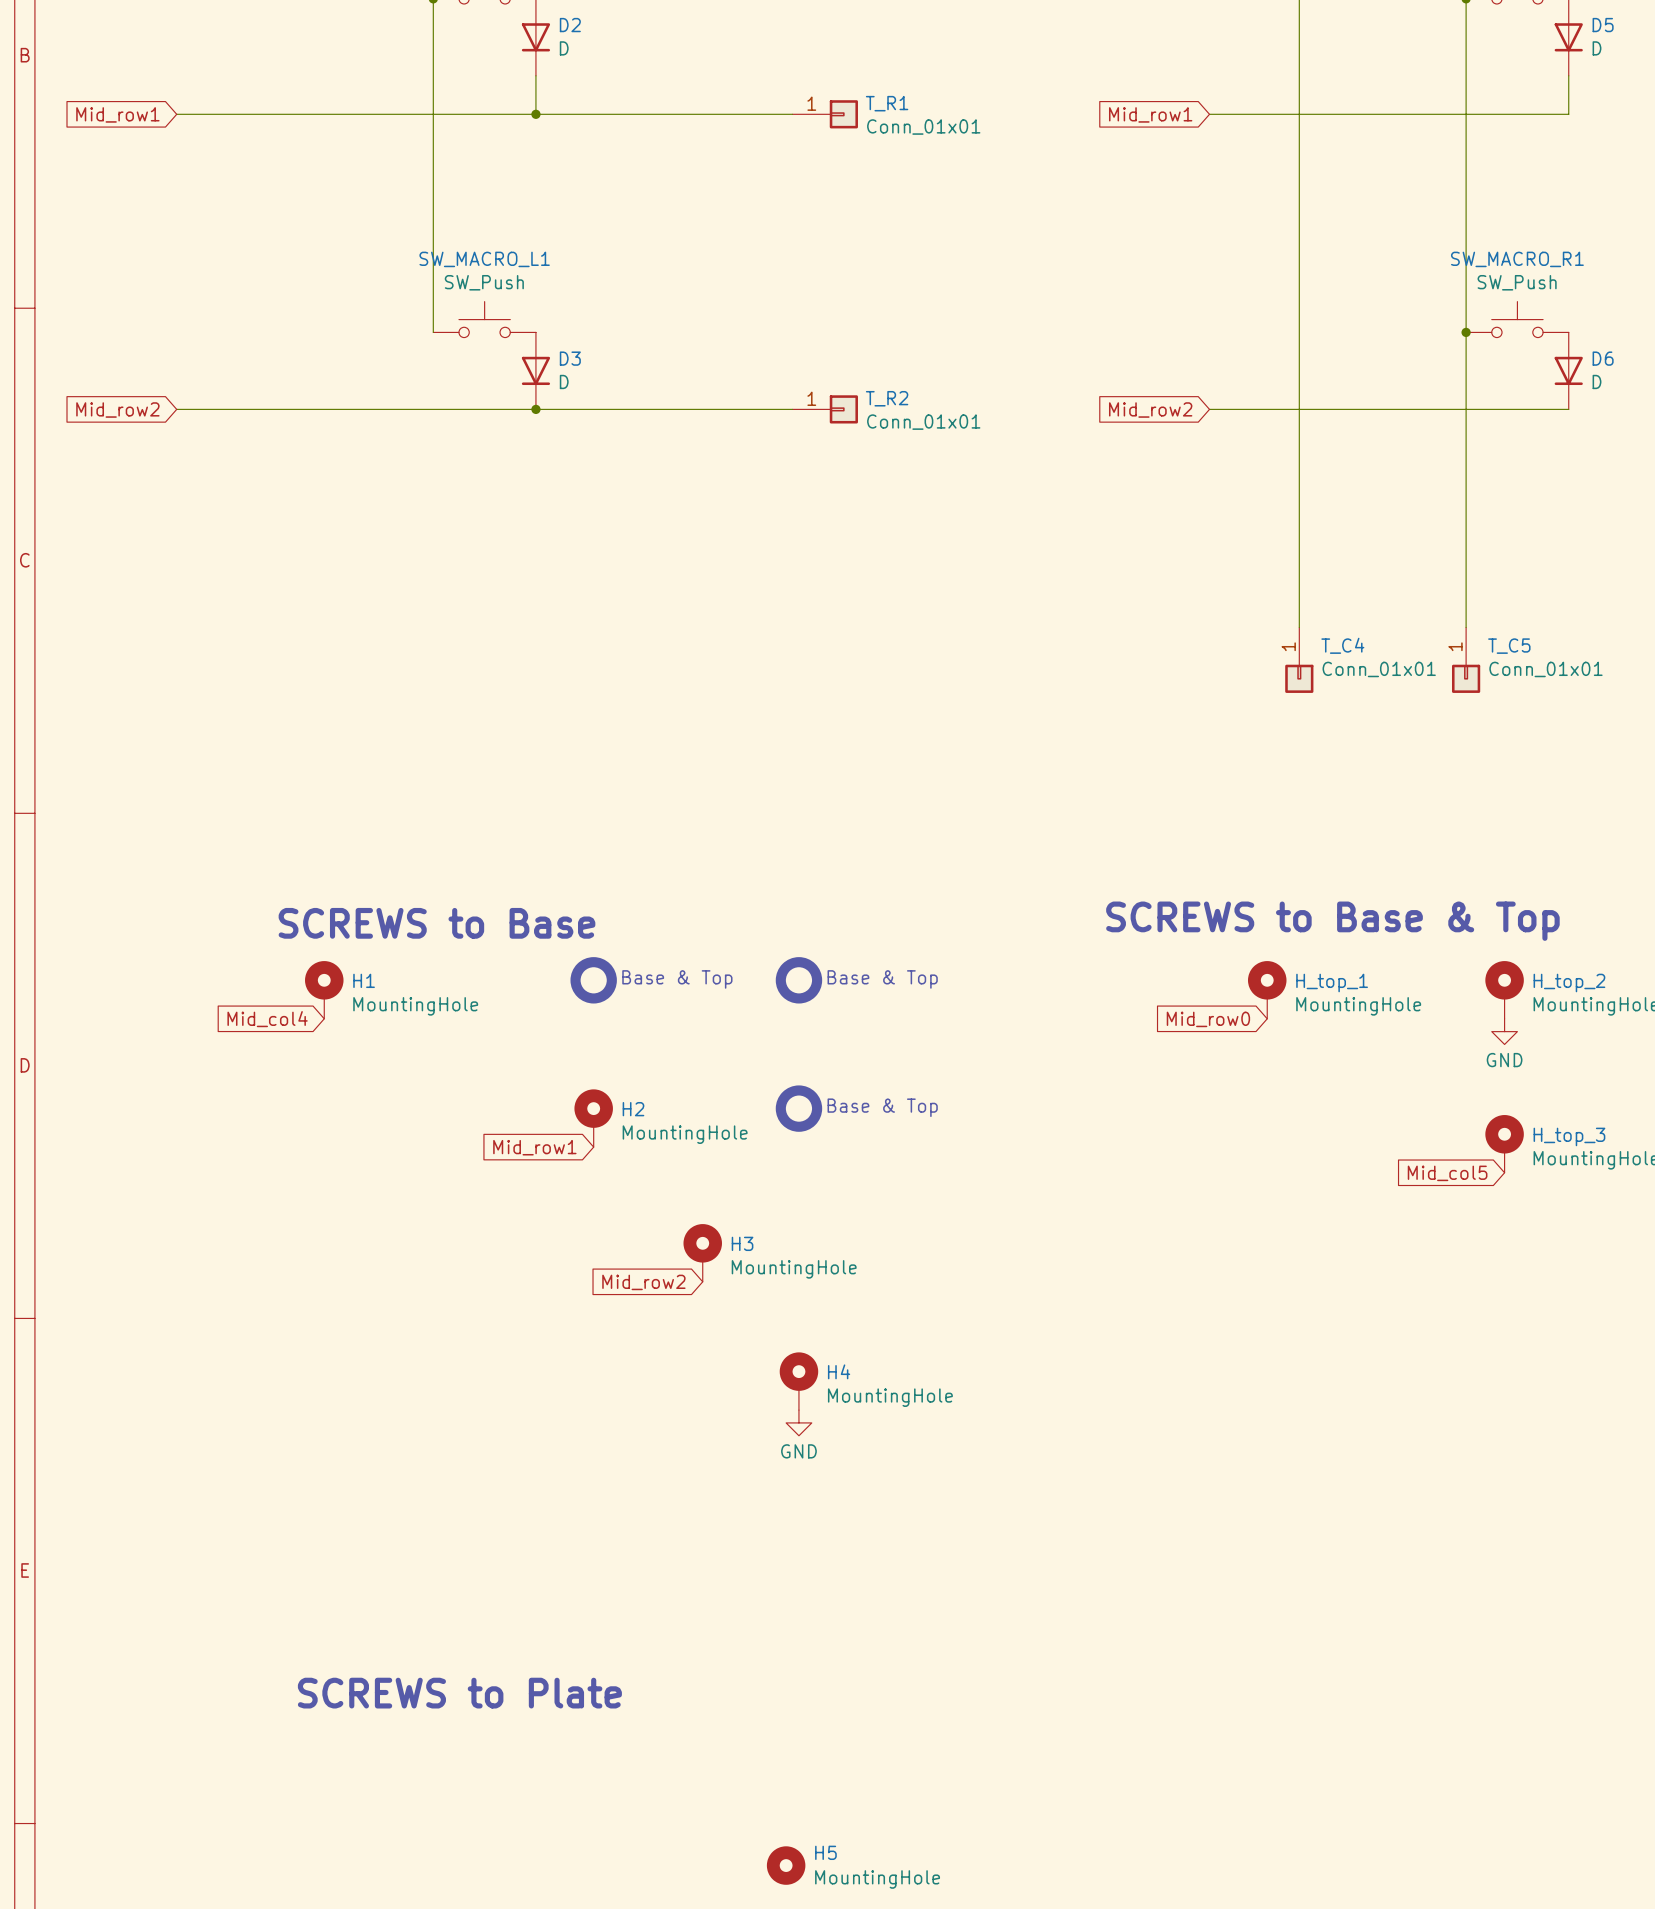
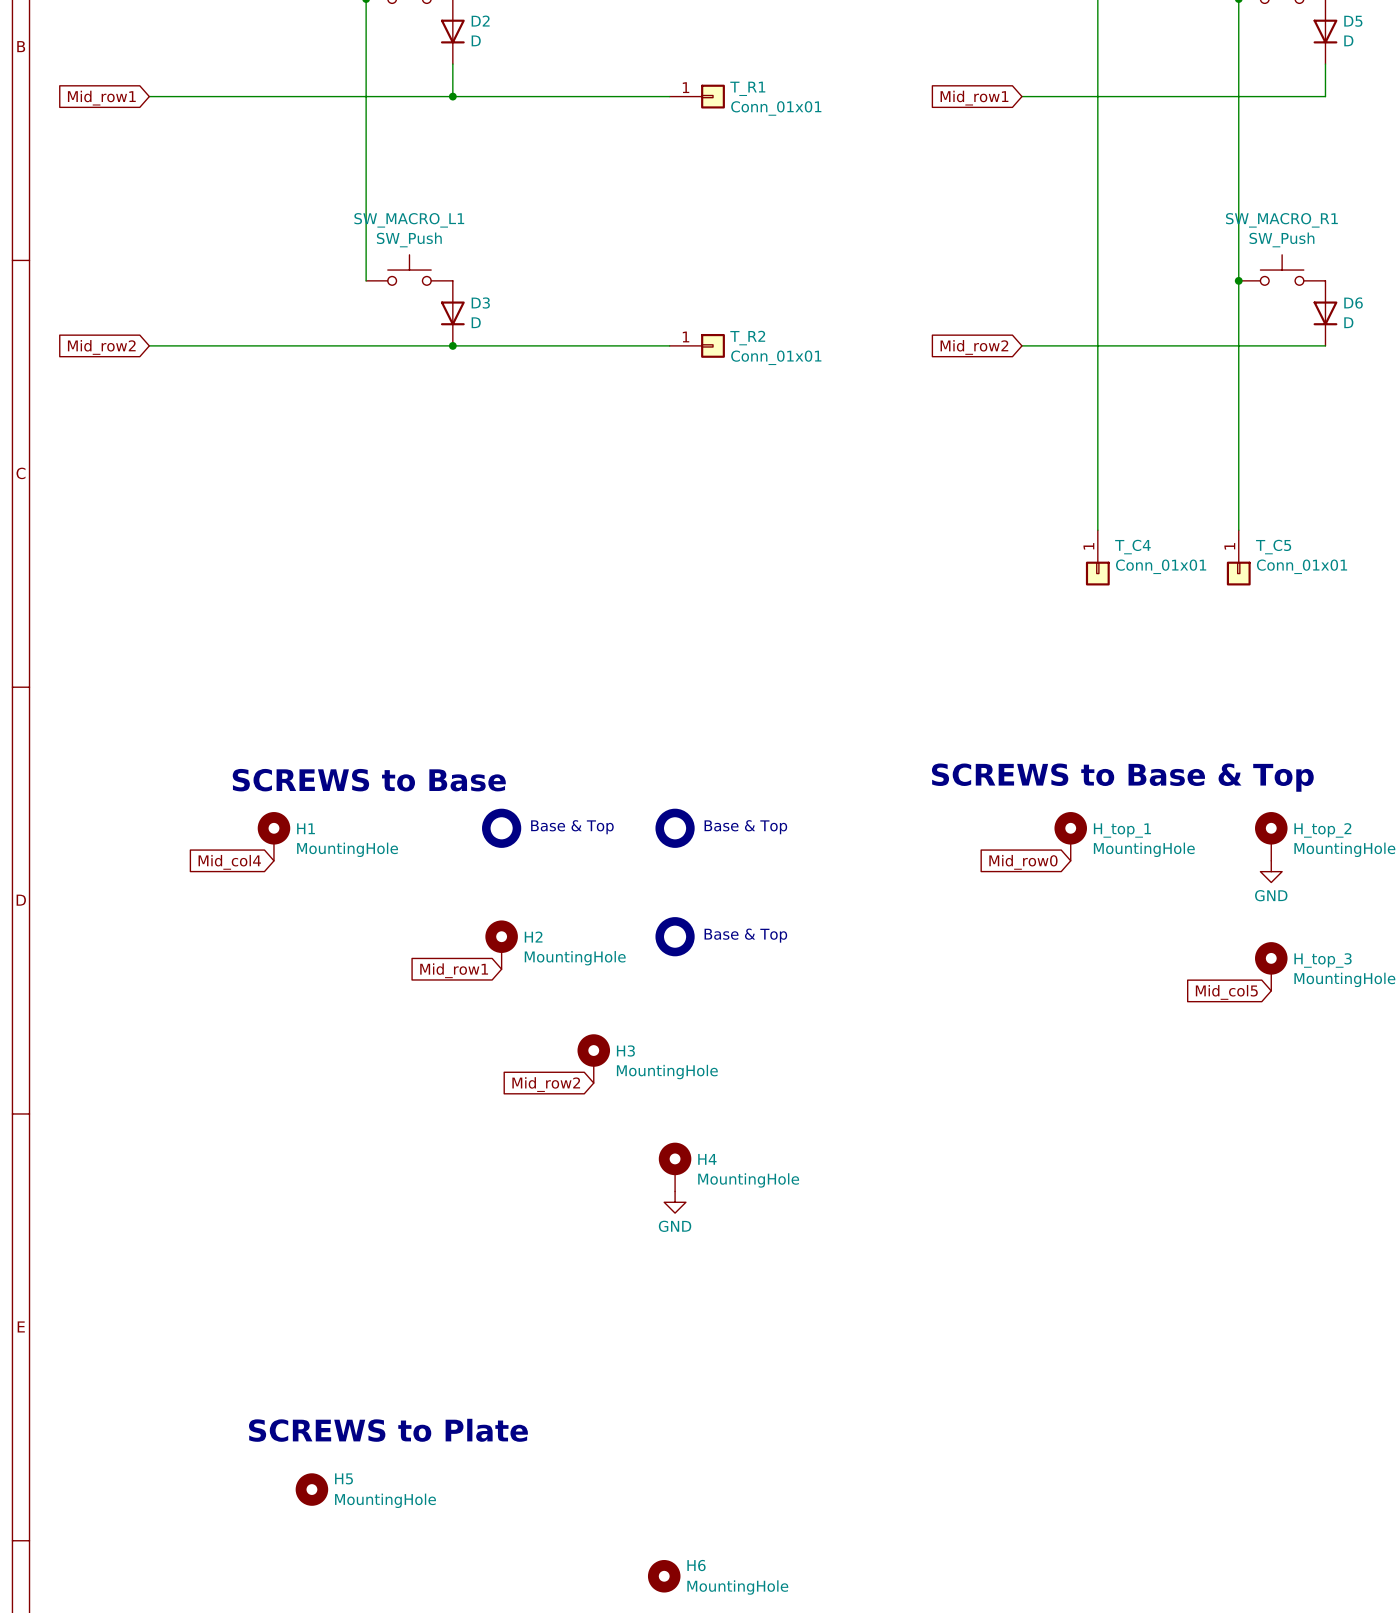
H5: none -> MountingHole (311, 1489)
H5 name: H5 (825, 1852) -> H6 (696, 1565)

